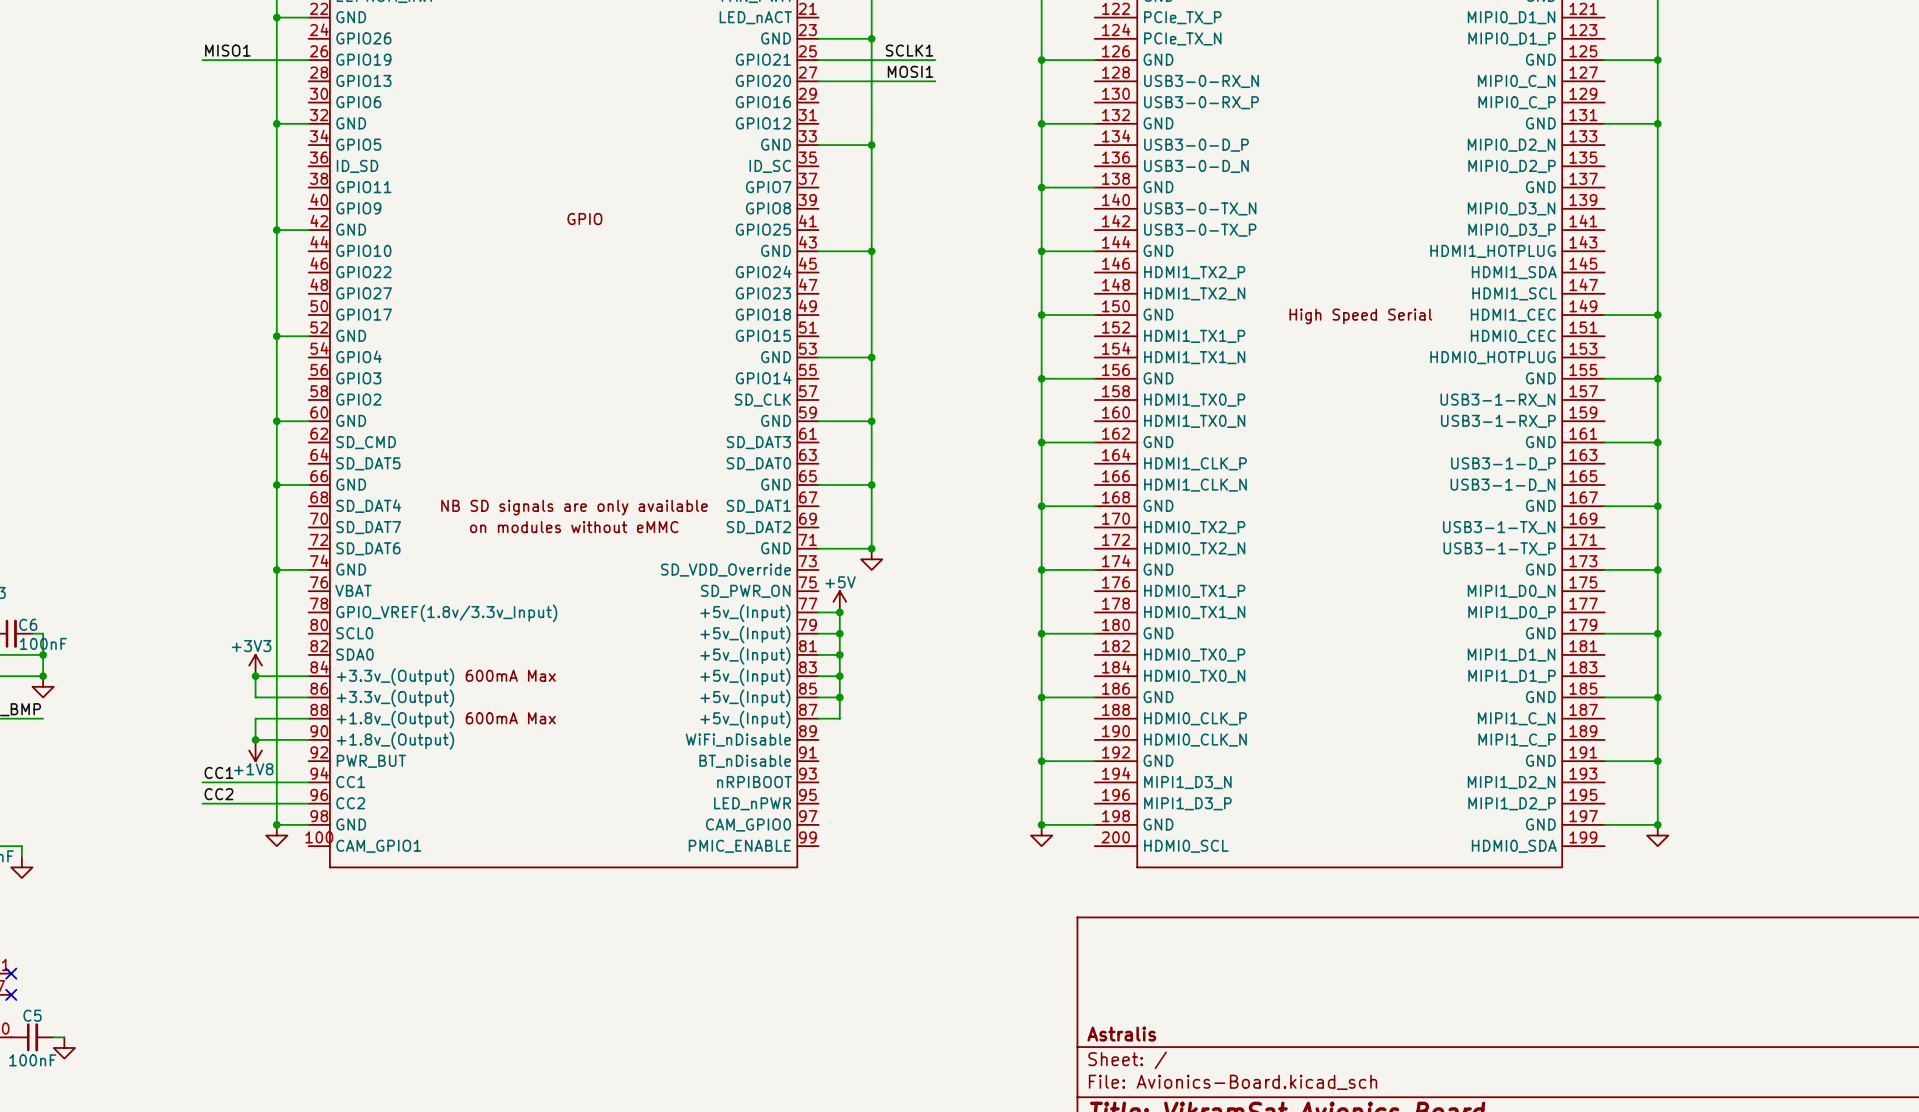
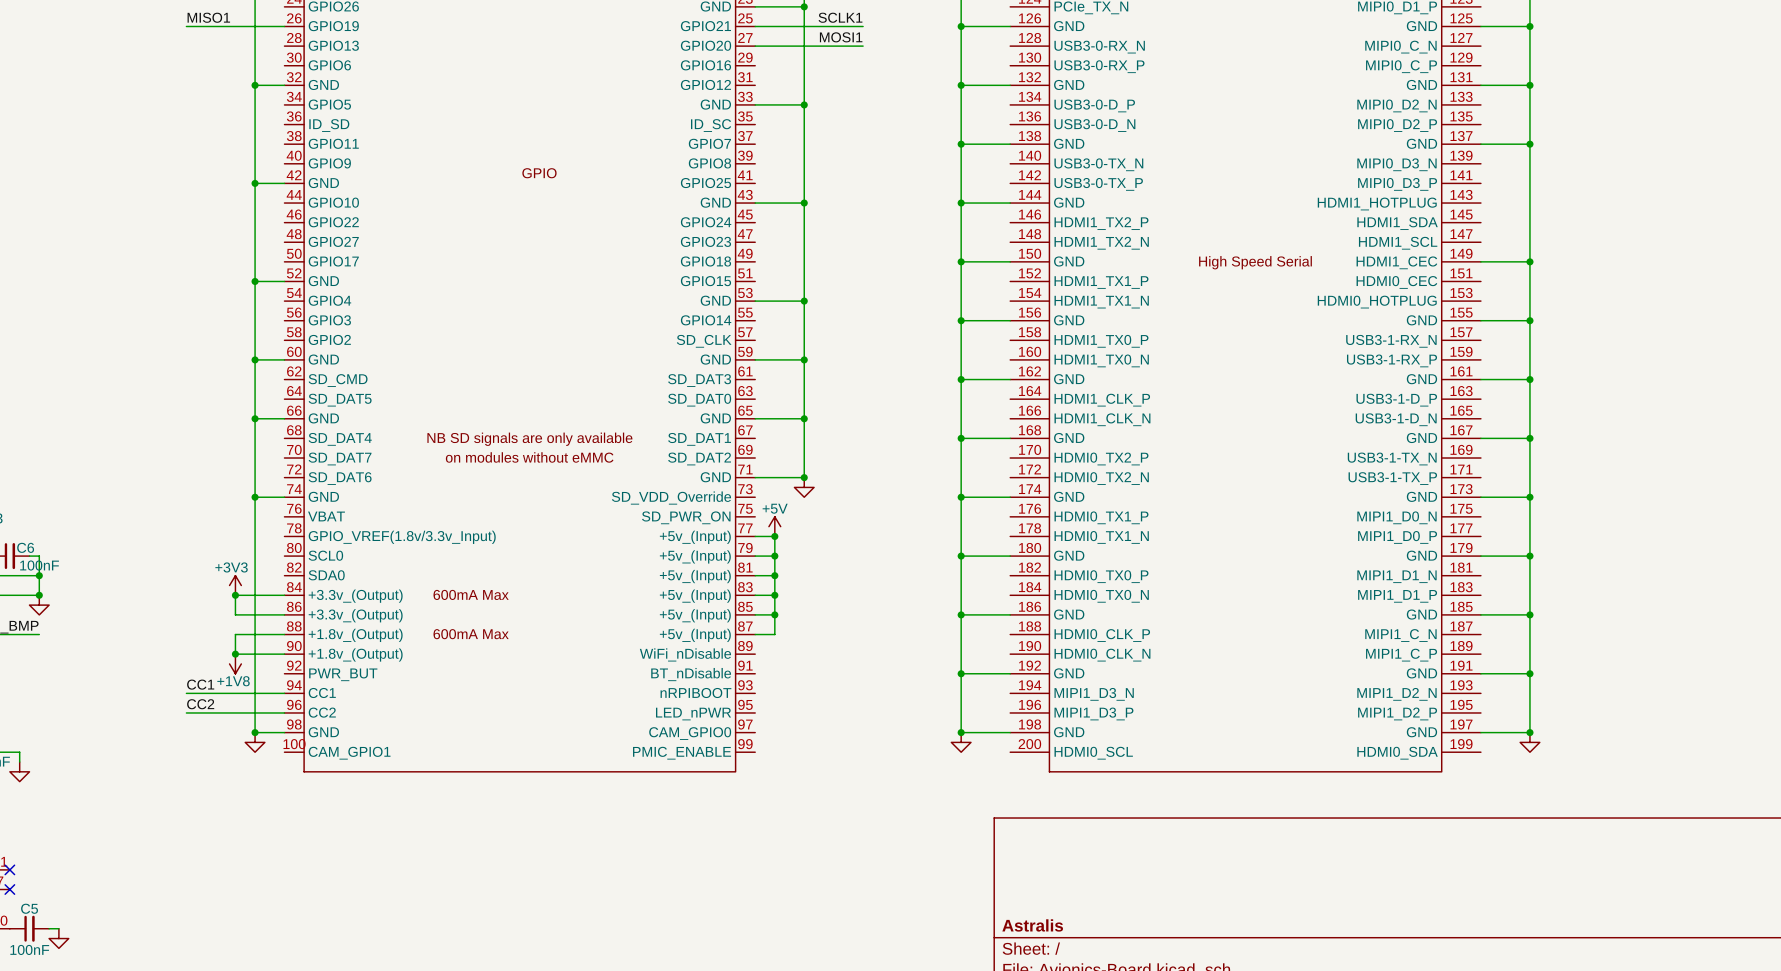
wire: none -> (1480, 144) (1529, 144)
junction: none -> (1529, 144)

